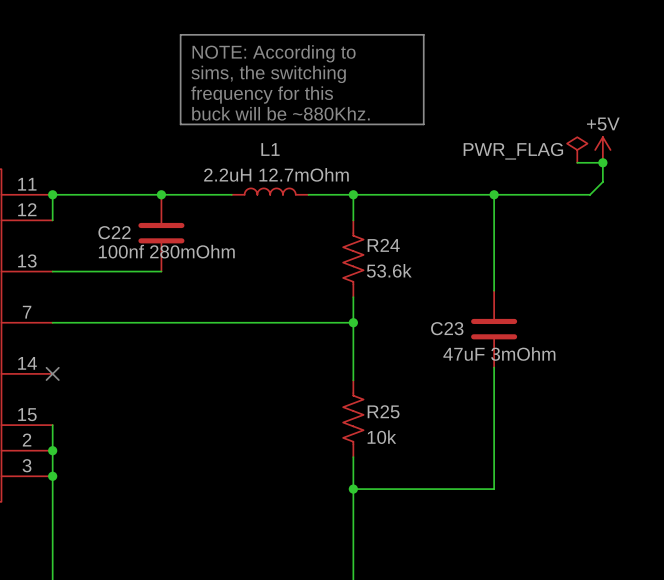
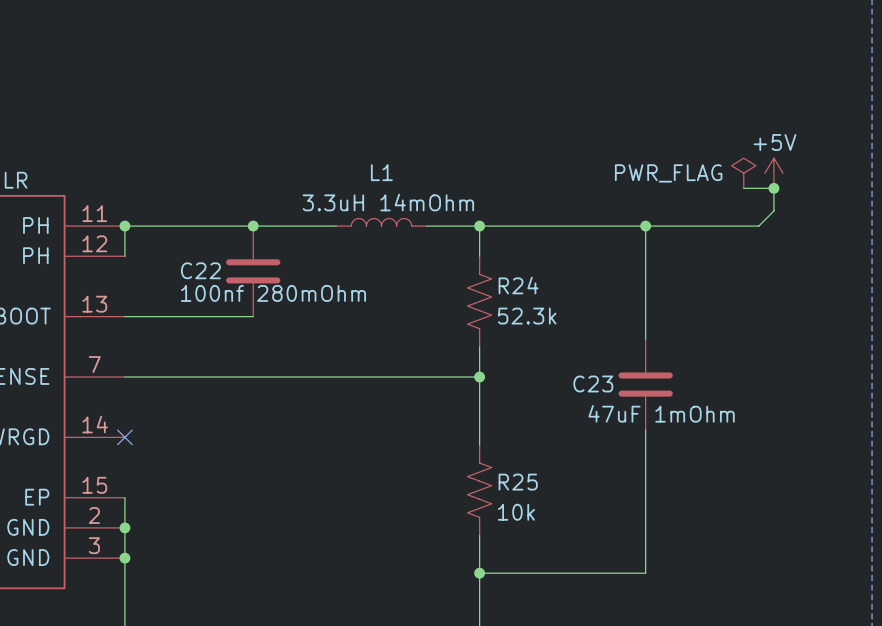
line: (180, 34) (423, 34) (423, 124) (180, 124) (180, 34) -> none
text: NOTE: According to (274, 53) -> none
text: sims, the switching (268, 74) -> none
text: frequency for this (262, 94) -> none
text: buck will be ~880Khz. (280, 113) -> none
L1 value: 2.2uH 12.7mOhm (276, 174) -> 3.3uH 14mOhm (388, 202)
R24 value: 53.6k (389, 270) -> 52.3k (527, 316)
C23 value: 47uF 3mOhm (499, 354) -> 47uF 1mOhm (661, 413)

